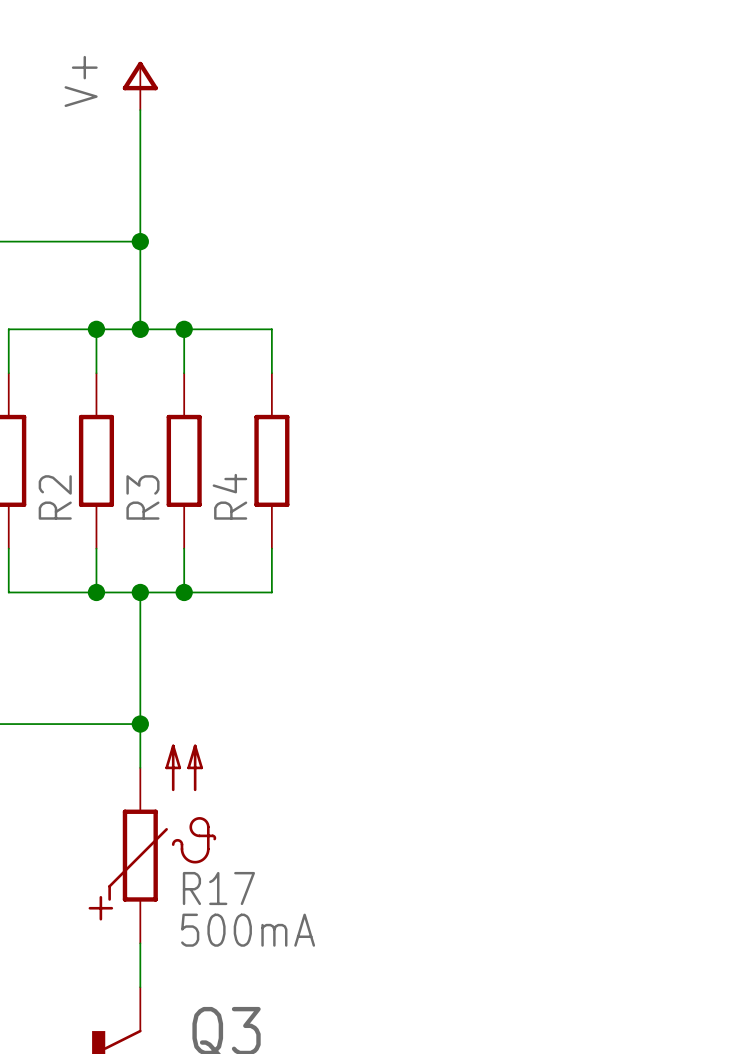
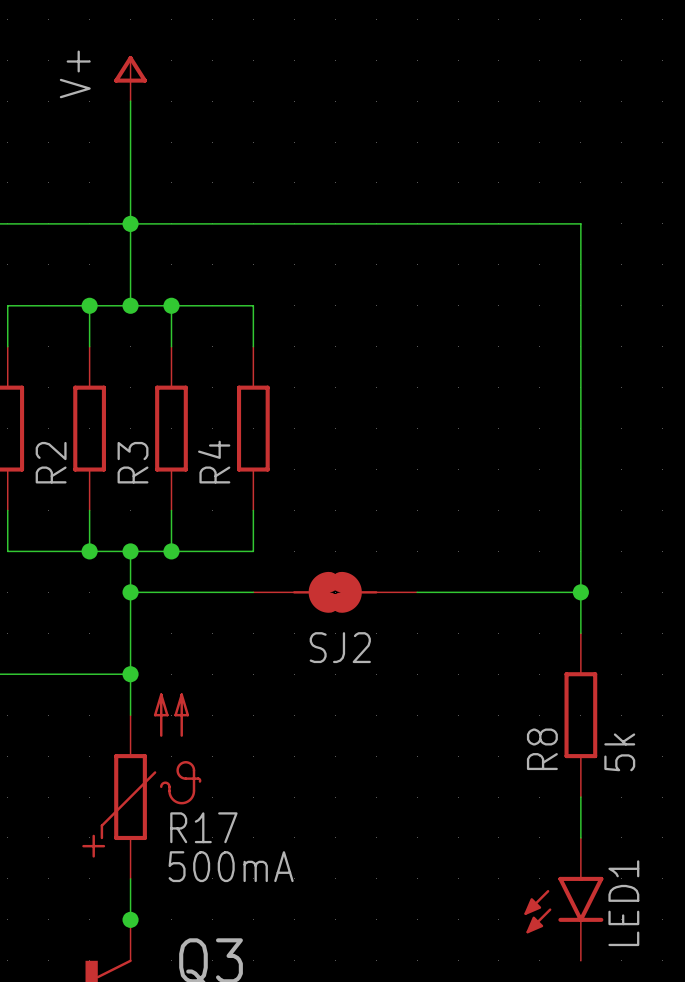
wire: none -> (130, 223) (580, 223) (580, 633)
wire: none -> (130, 592) (253, 592)
junction: none -> (130, 592)
SJ2: none -> (335, 592)
wire: none -> (417, 592) (580, 592)
junction: none -> (580, 592)
R8: none -> 5k (580, 715)
wire: none -> (580, 797) (580, 837)
LED1: none -> (563, 899)
junction: none -> (130, 919)

